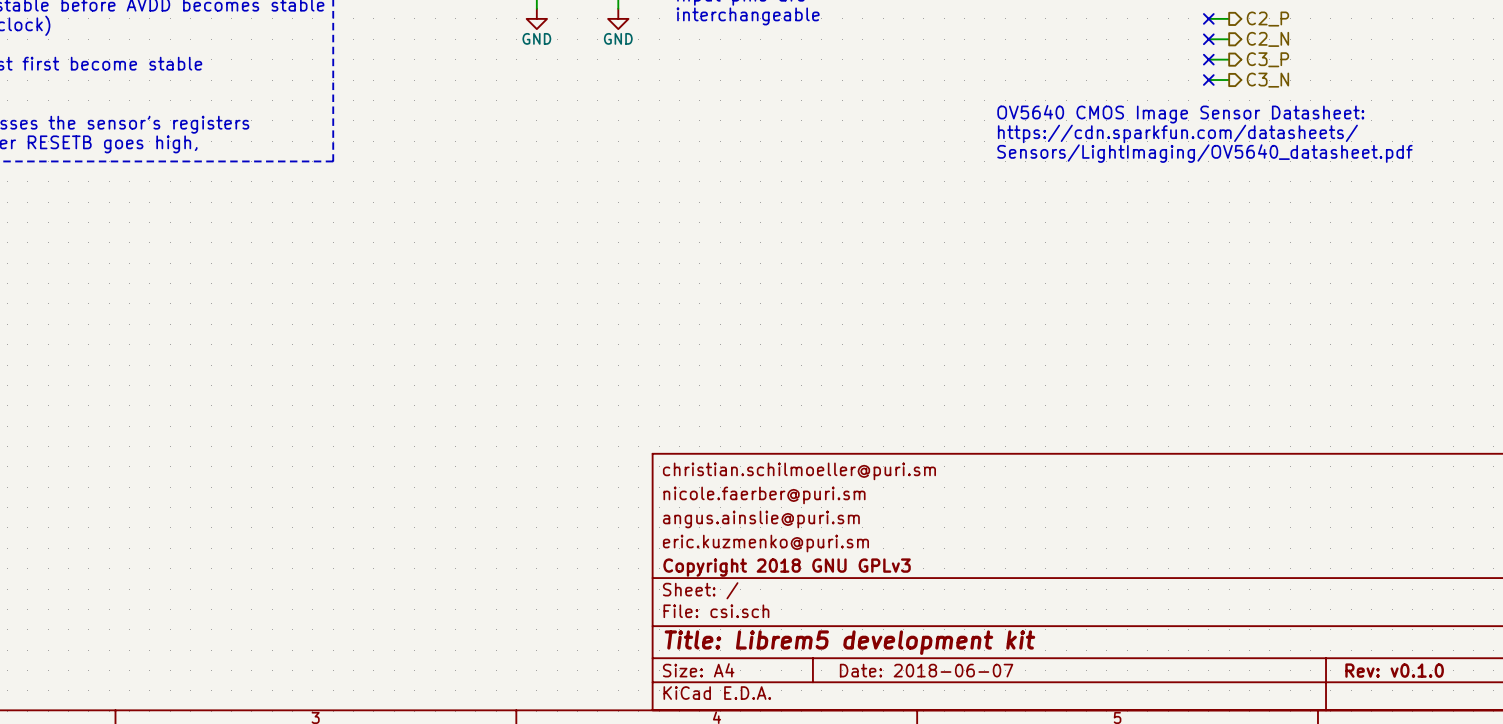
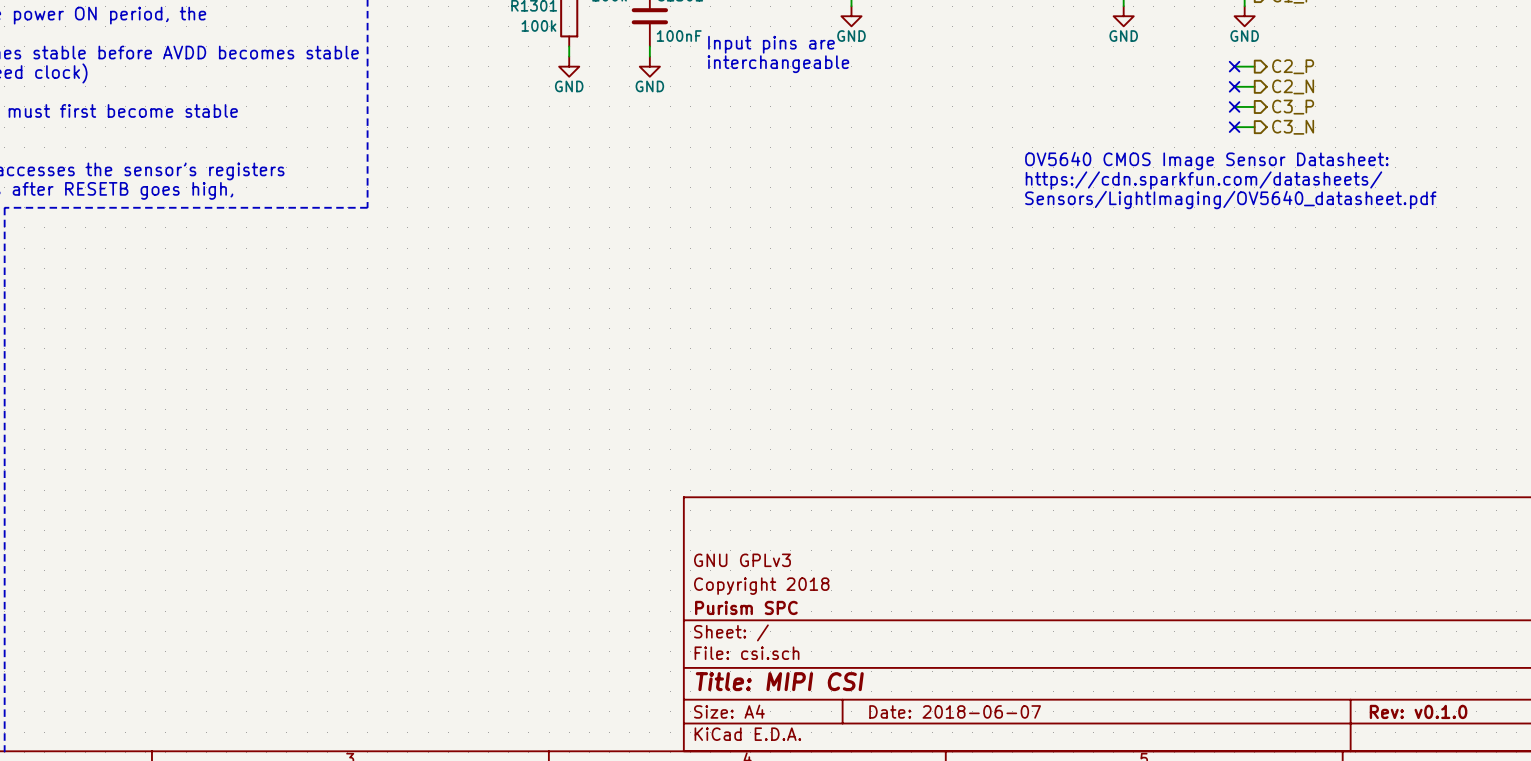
title block: christian.schilmoeller@puri.sm (799, 471) -> none
title block: nicole.faerber@puri.sm (764, 495) -> none
title block: angus.ainslie@puri.sm (761, 519) -> GNU GPLv3 (742, 560)
title block: eric.kuzmenko@puri.sm (765, 543) -> Copyright 2018 (761, 586)
title block: Copyright 2018 GNU GPLv3 (787, 567) -> Purism SPC (746, 607)
title block: Title: Librem5 development kit (849, 642) -> Title: MIPI CSI (779, 681)

